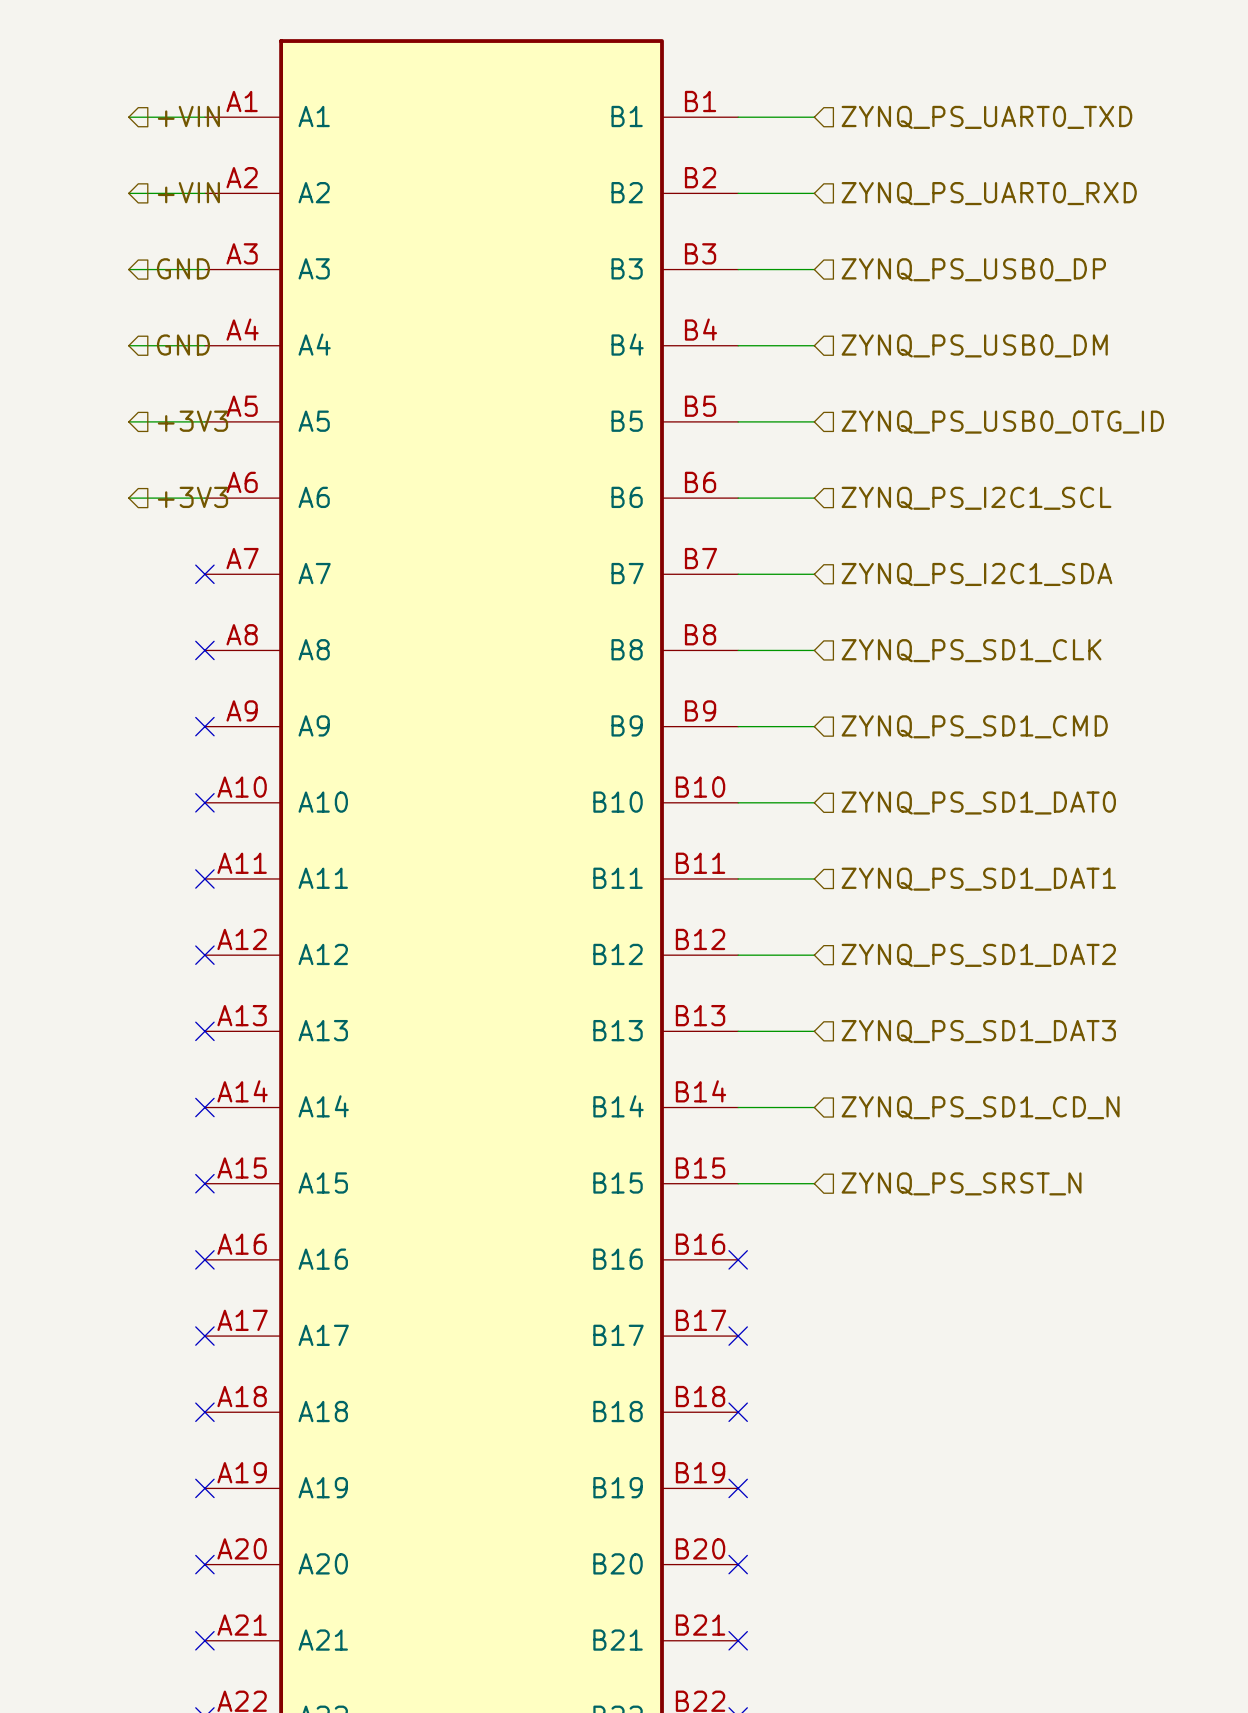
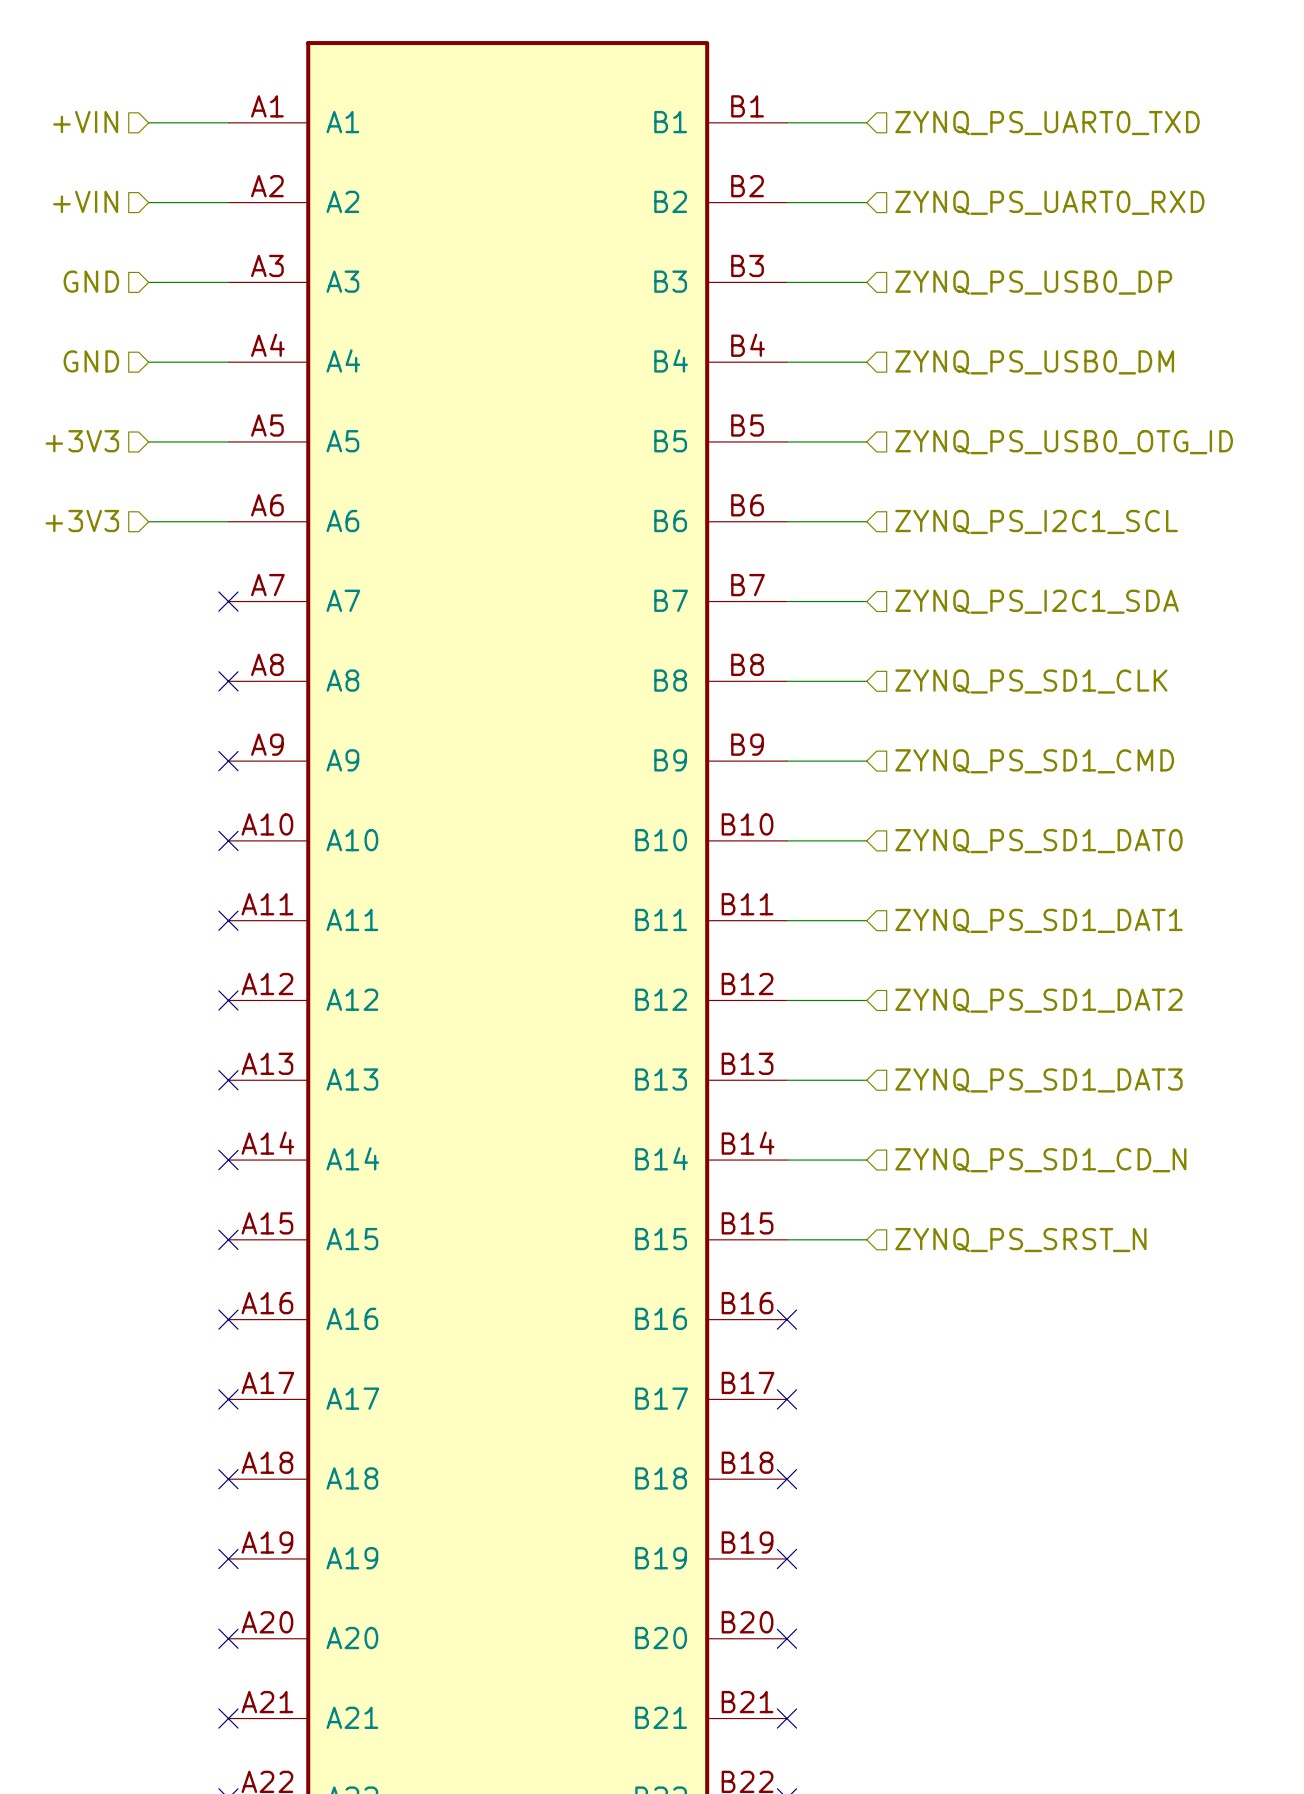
hierarchical label: none -> +VIN (85, 122)
hierarchical label: +VIN (188, 116) -> none
hierarchical label: none -> +VIN (85, 201)
hierarchical label: +VIN (188, 192) -> none
hierarchical label: none -> GND (91, 281)
hierarchical label: GND (183, 268) -> none
hierarchical label: none -> GND (91, 361)
hierarchical label: GND (183, 345) -> none
hierarchical label: none -> +3V3 (82, 441)
hierarchical label: +3V3 (192, 421) -> none
hierarchical label: none -> +3V3 (82, 521)
hierarchical label: +3V3 (192, 497) -> none

